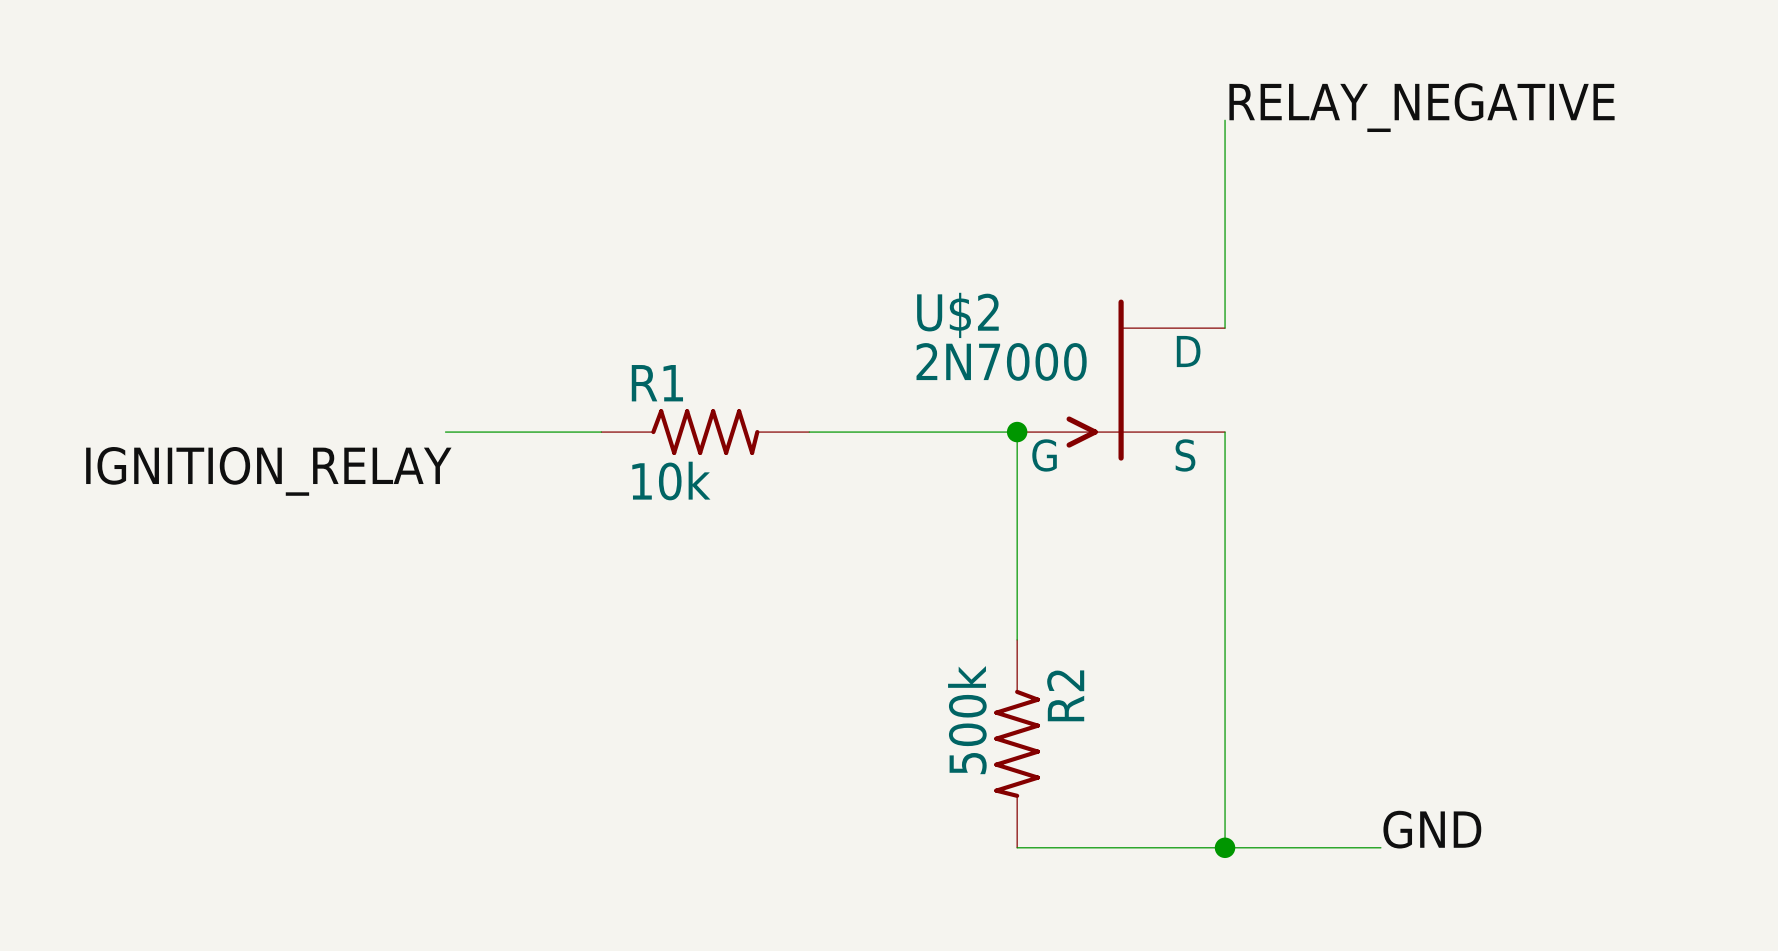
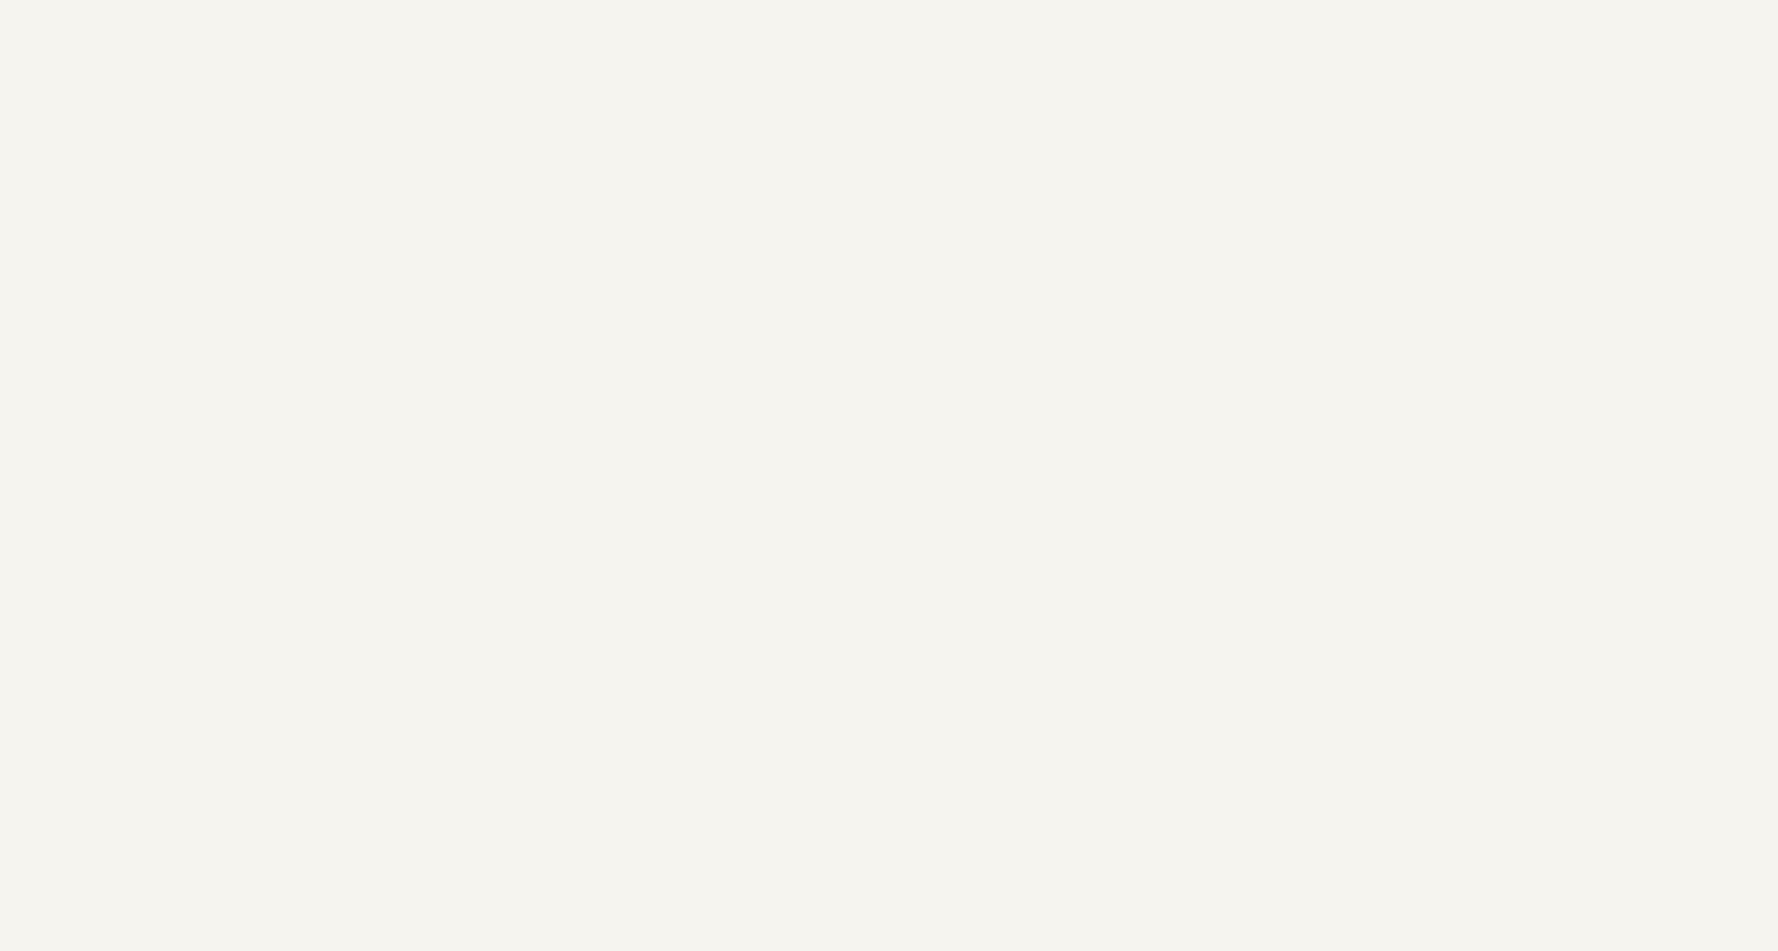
label: RELAY_NEGATIVE (1422, 107) -> none
wire: (1225, 120) (1225, 328) -> none
U$2: 2N7000 (1121, 380) -> none
wire: (445, 432) (601, 432) -> none
R1: 10k (705, 432) -> none
wire: (809, 432) (1017, 432) (1017, 639) -> none
junction: (1017, 432) -> none
wire: (1225, 432) (1225, 847) -> none
label: IGNITION_RELAY (268, 471) -> none
R2: 500k (1017, 743) -> none
label: GND (1432, 829) -> none
wire: (1017, 847) (1380, 847) -> none
junction: (1225, 847) -> none

